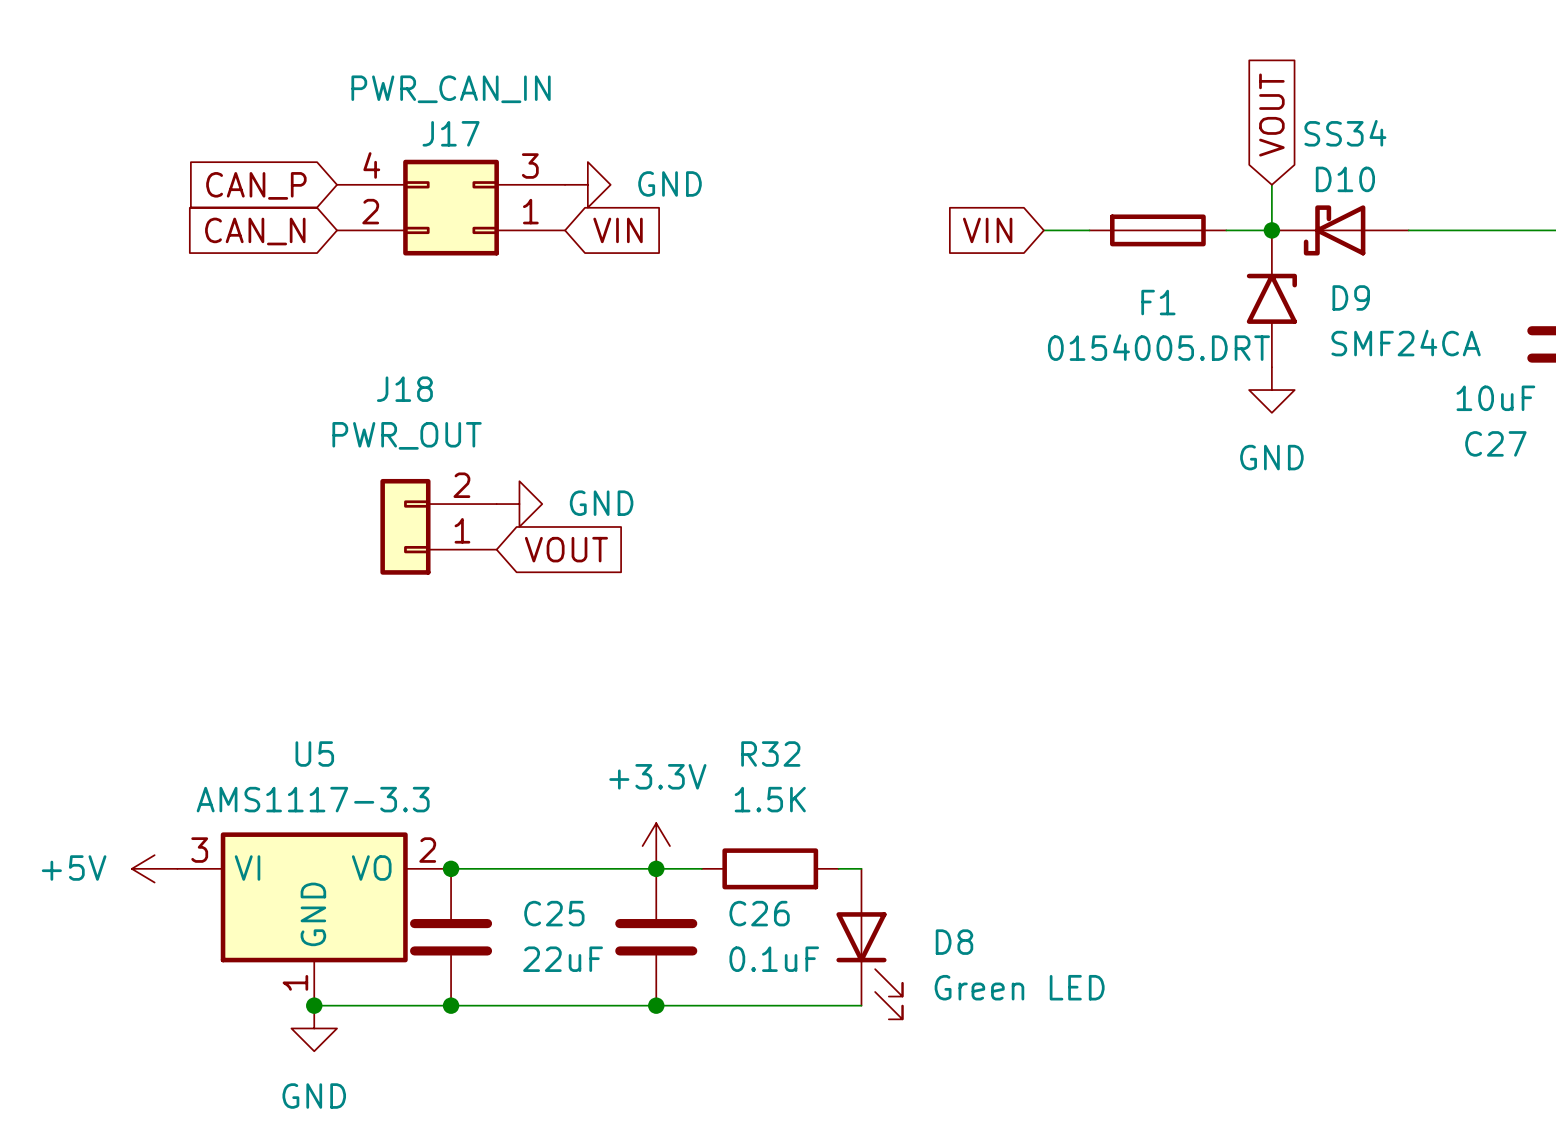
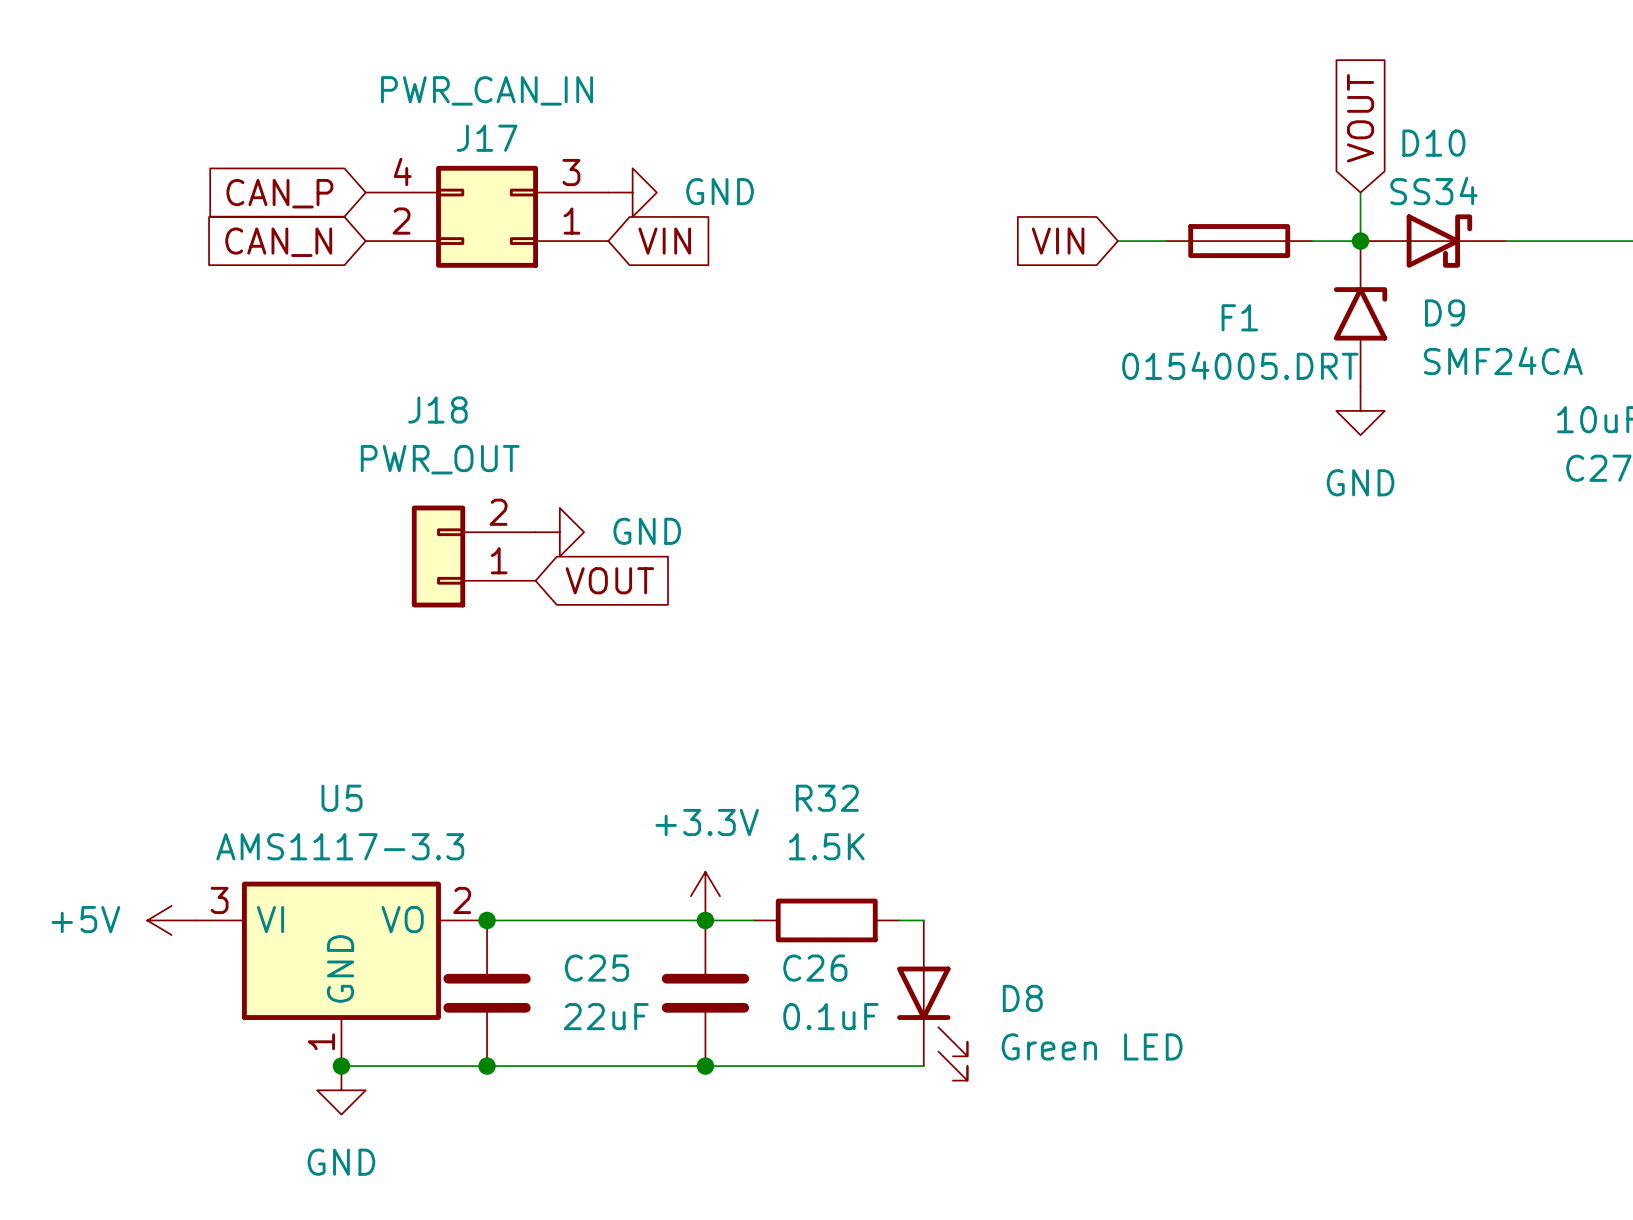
D10 value position: SS34 (1345, 133) -> SS34 (1433, 191)
D10 name position: D10 (1345, 179) -> D10 (1433, 143)
D10 rotation: 0° (1334, 230) -> 180° (1439, 241)

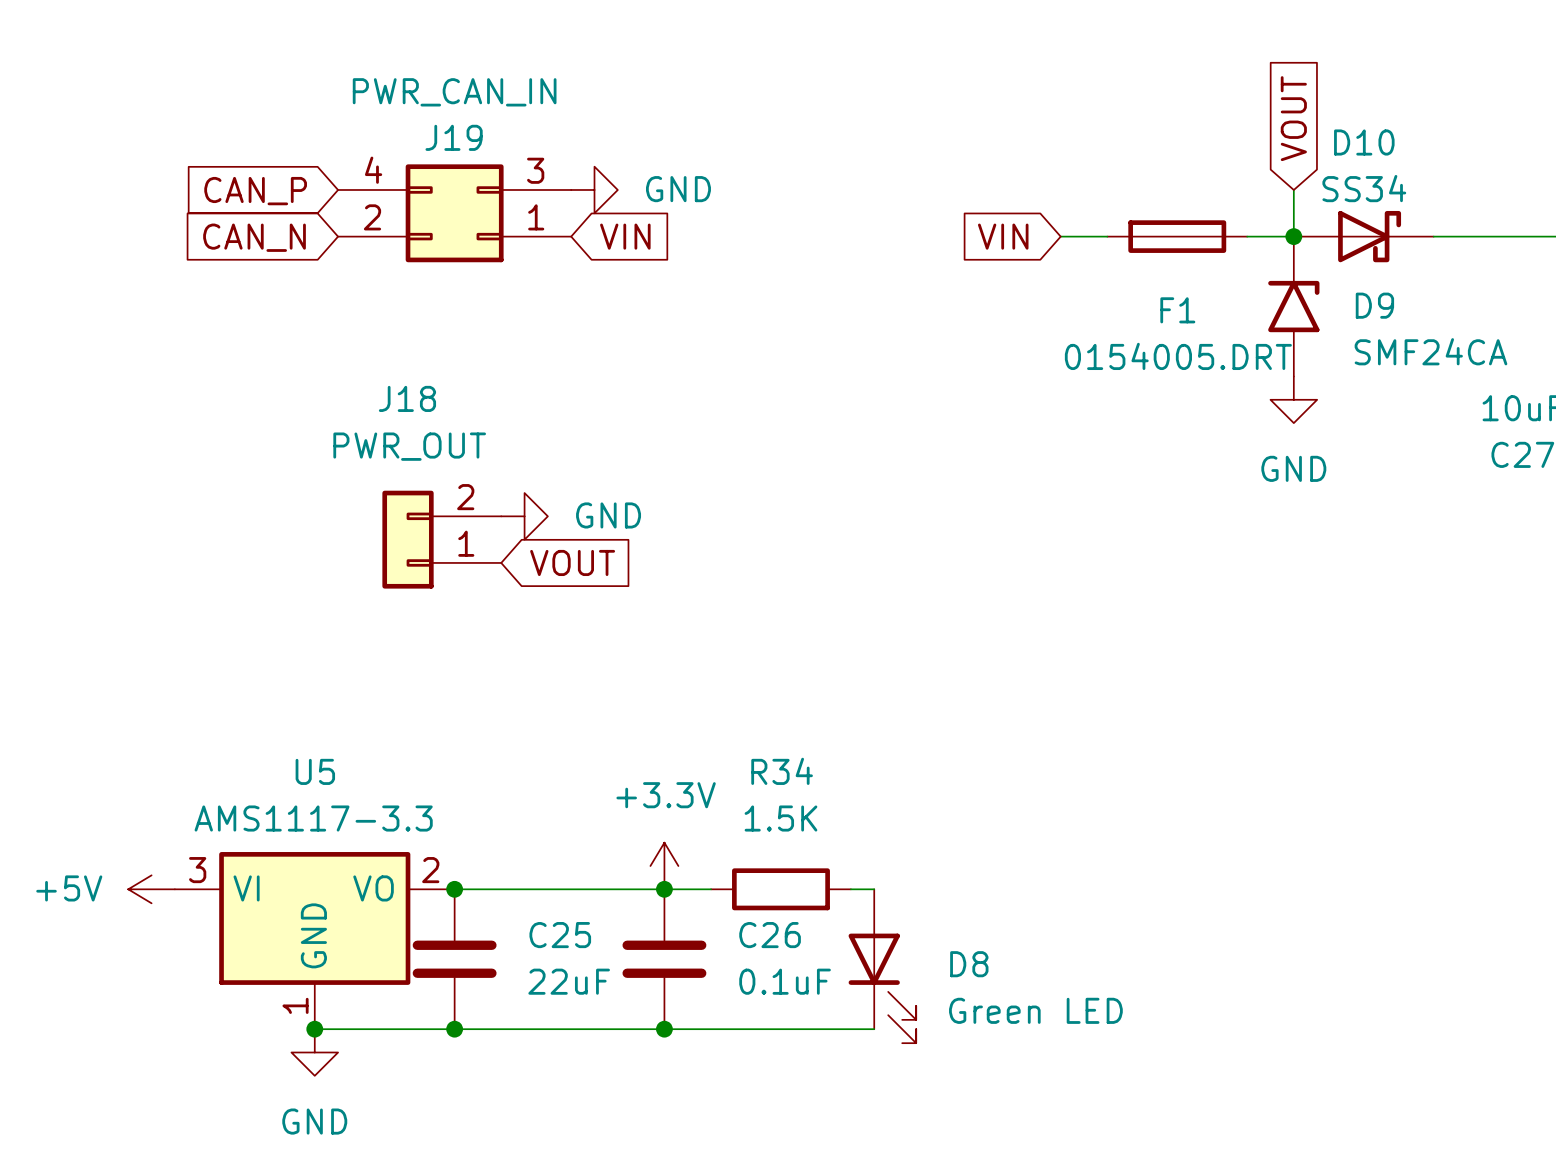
J17 name: J17 (487, 138) -> J19 (454, 137)
R32 name: R32 (827, 798) -> R34 (782, 771)

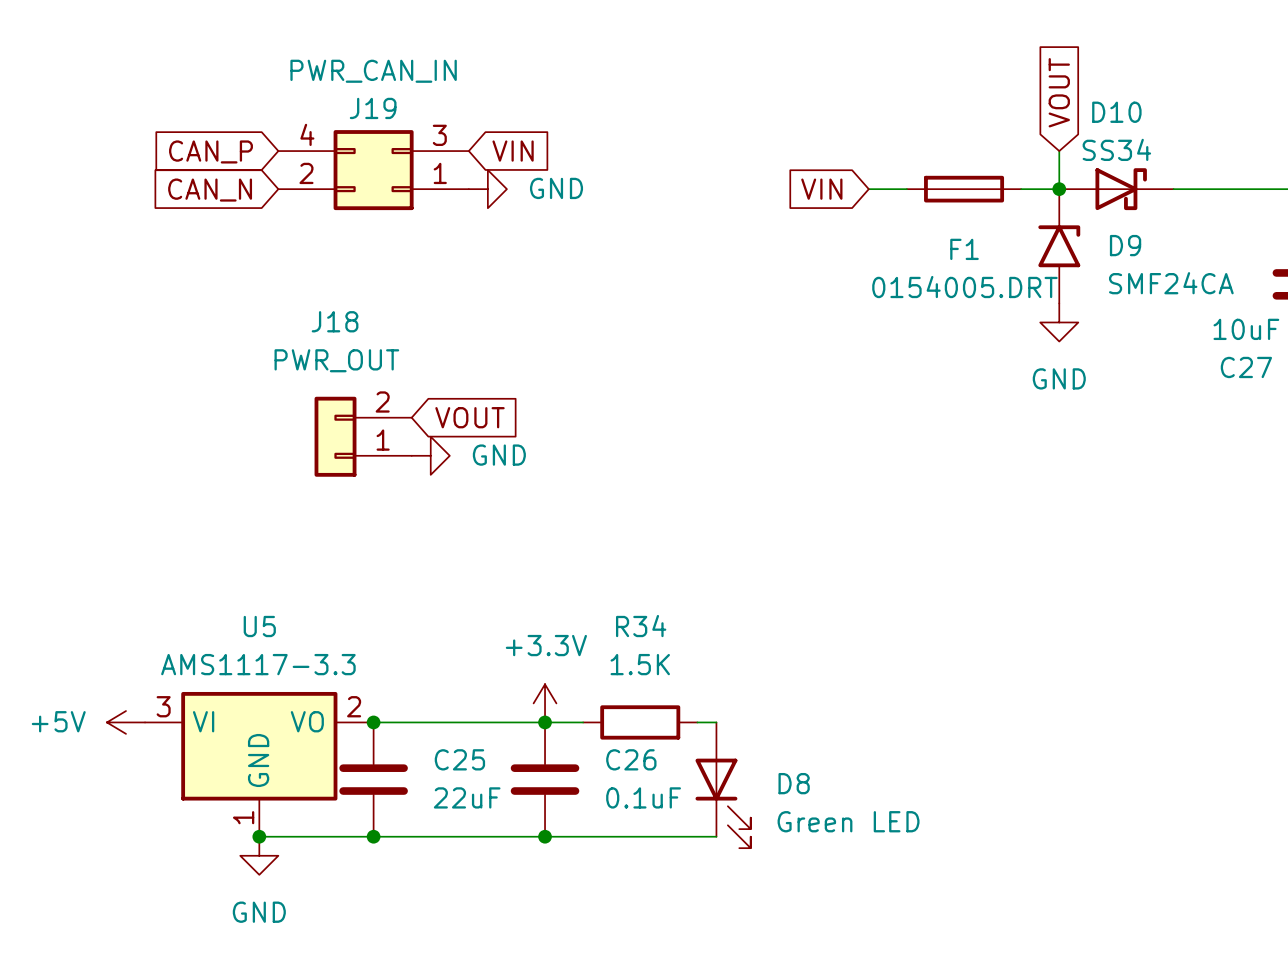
power symbol position: GND (594, 189) -> GND (487, 189)
global label position: VIN (625, 236) -> VIN (513, 151)
power symbol position: GND (524, 516) -> GND (430, 455)
global label position: VOUT (572, 562) -> VOUT (470, 417)

